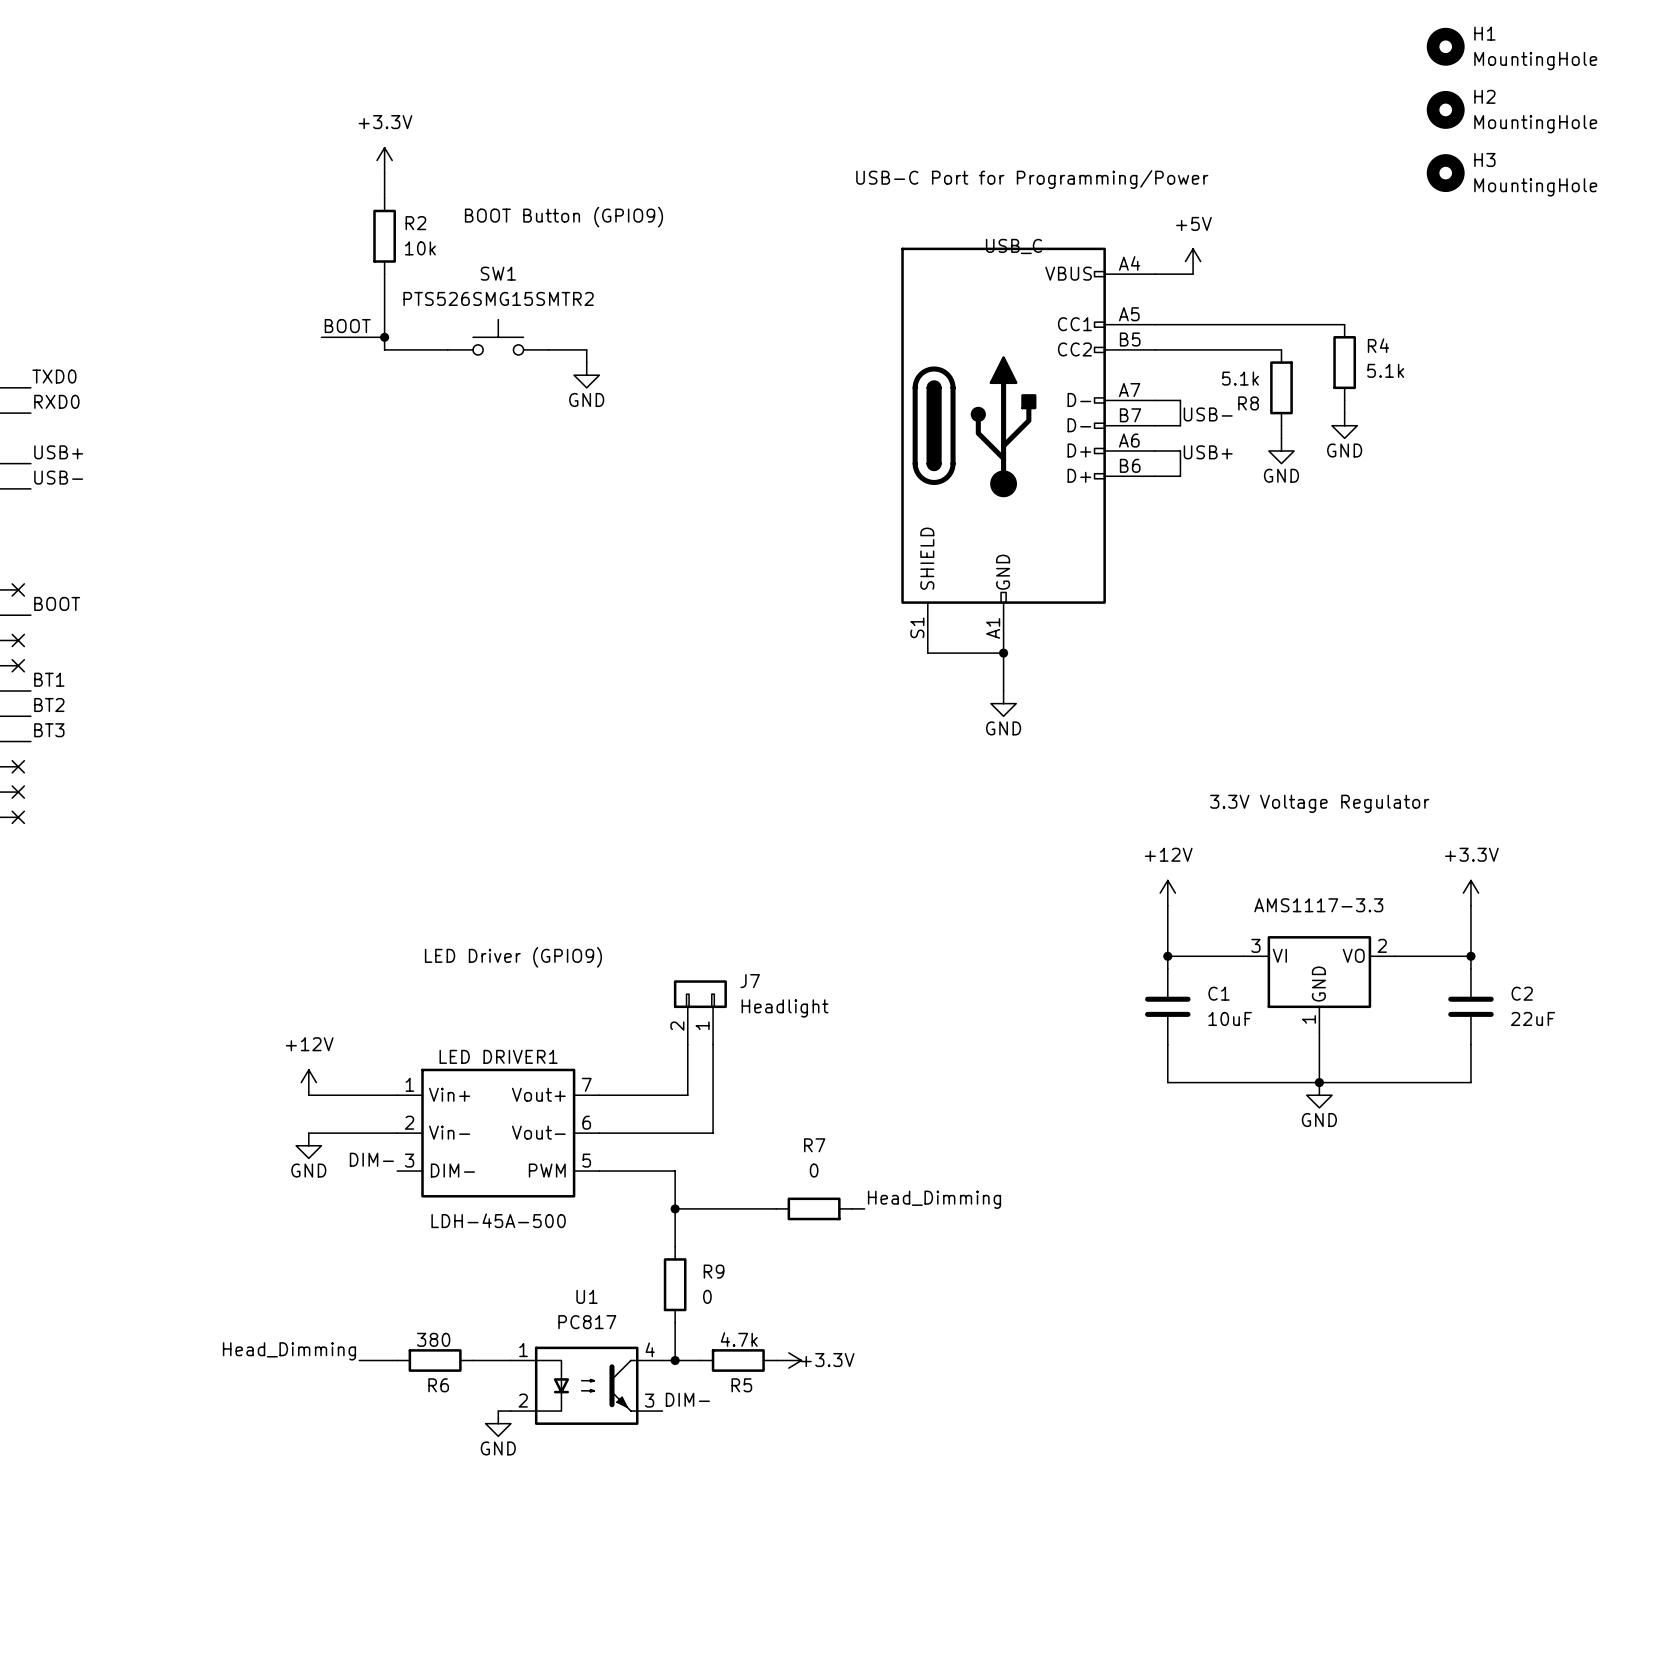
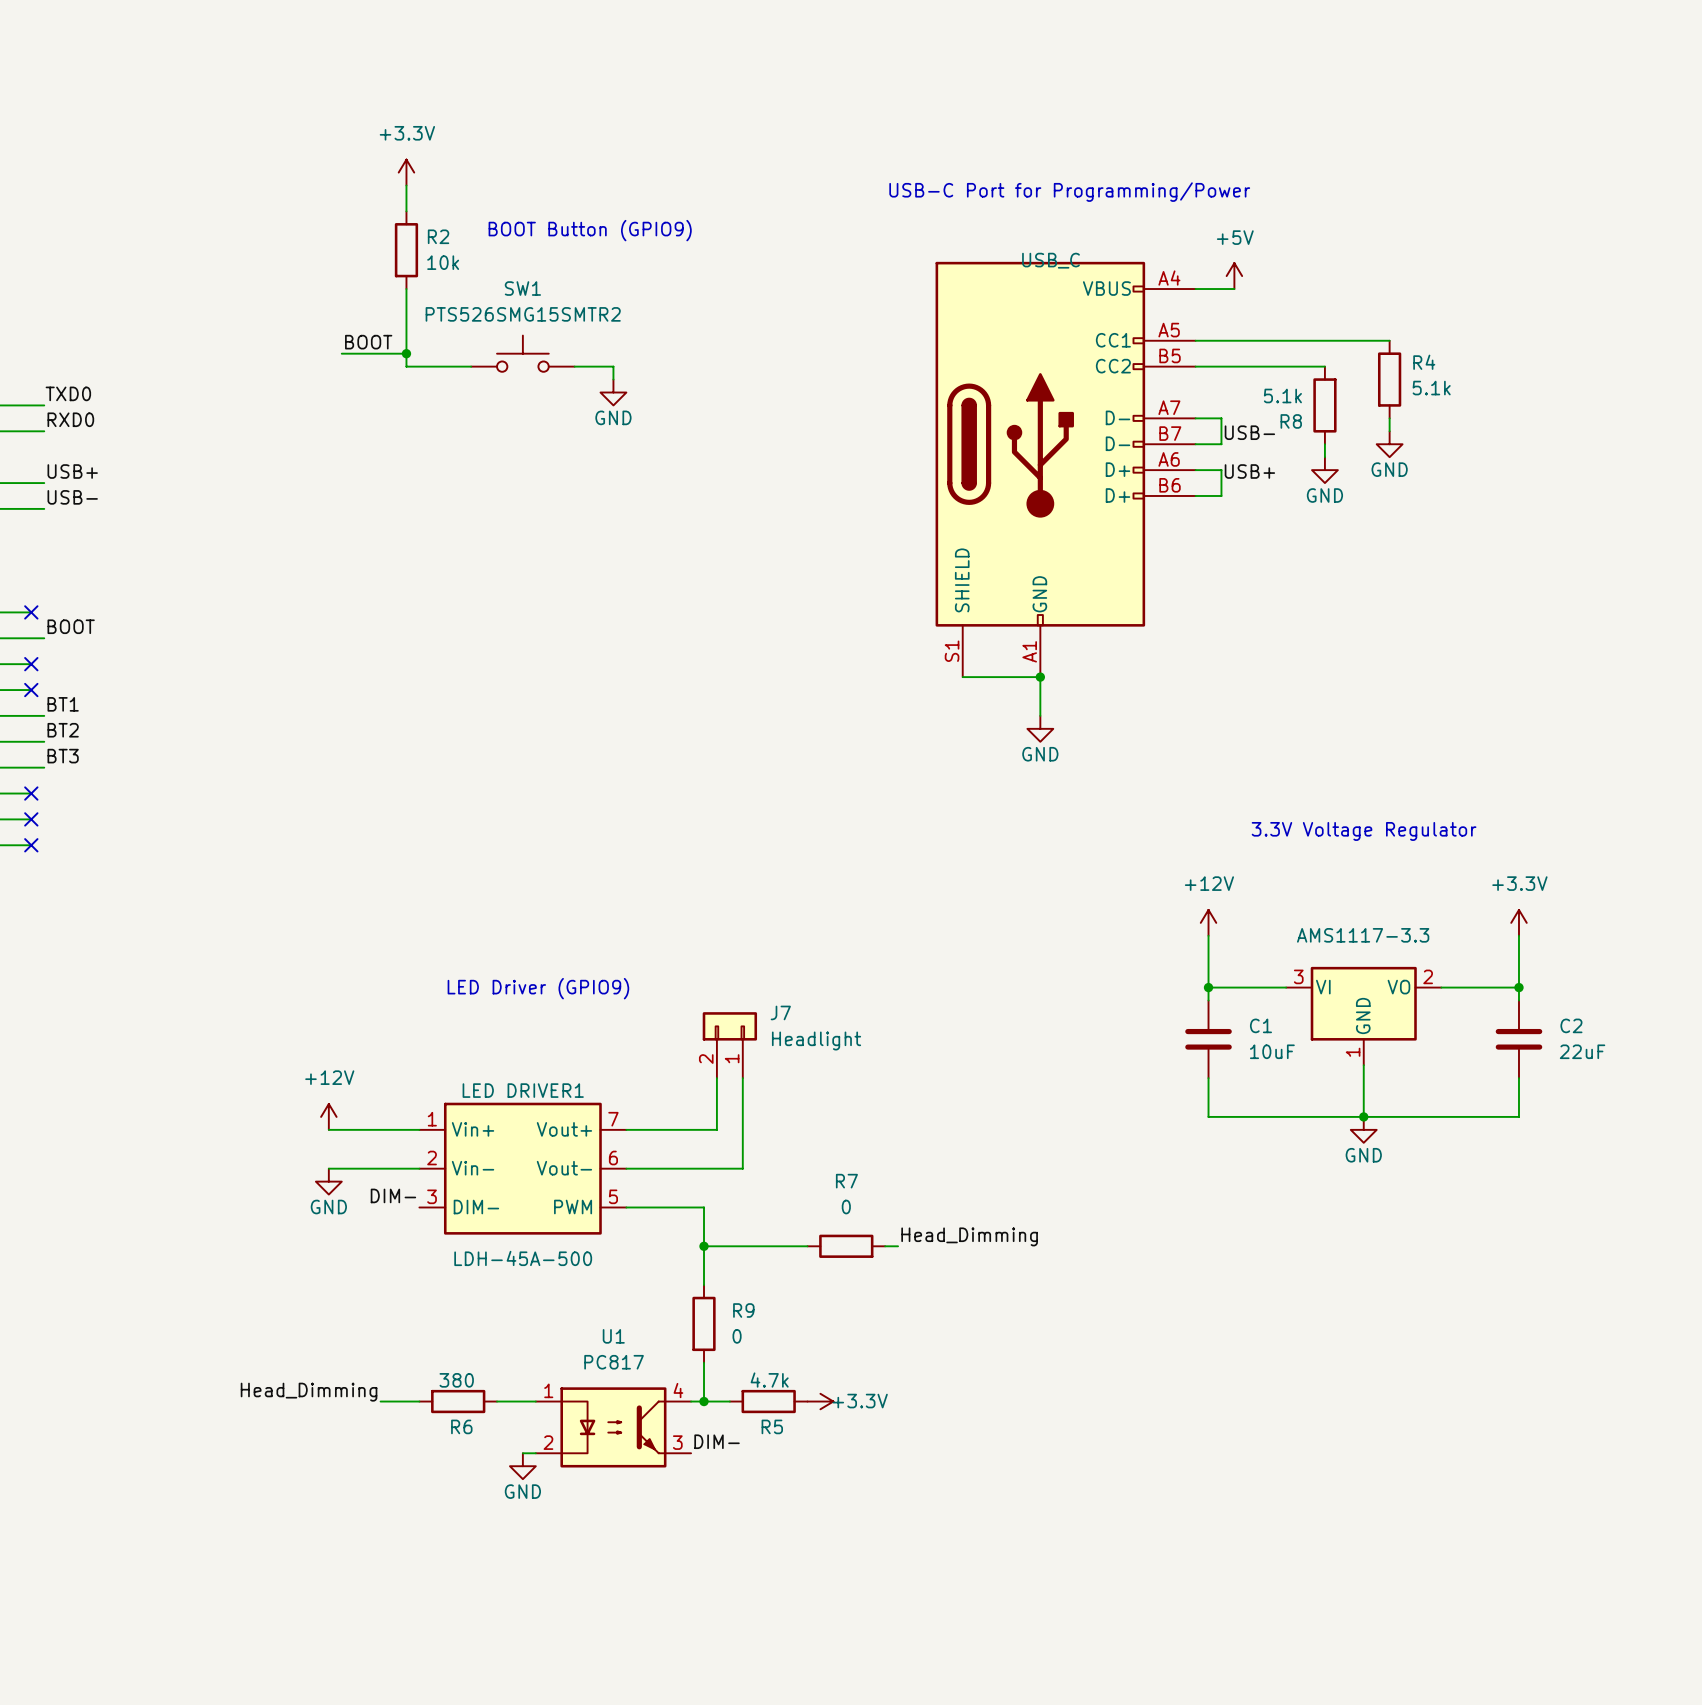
H1: MountingHole (1445, 46) -> none
H2: MountingHole (1445, 109) -> none
H3: MountingHole (1445, 173) -> none

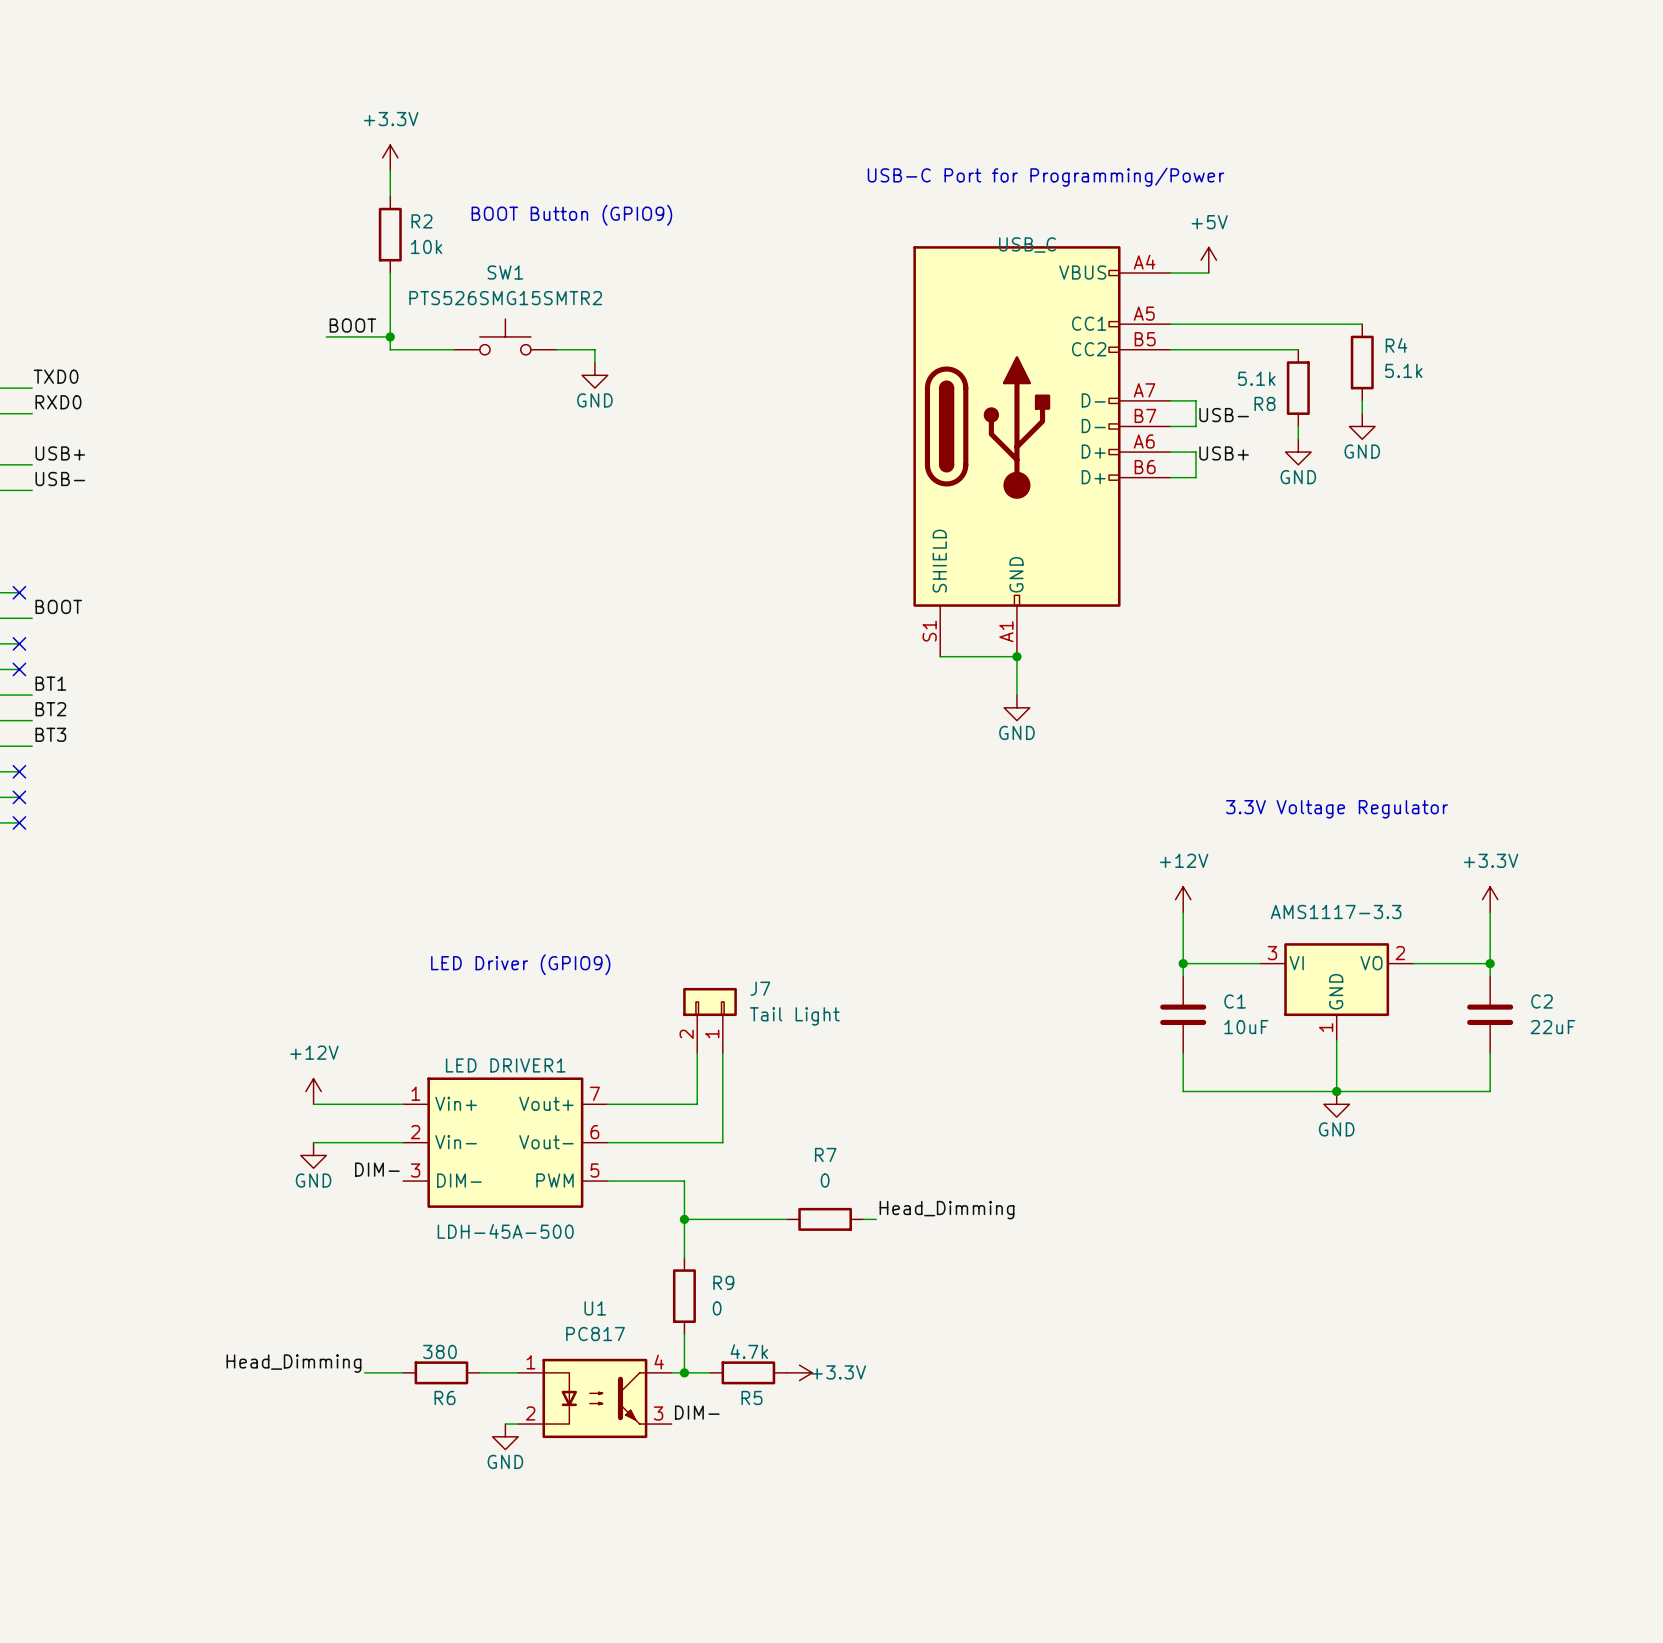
J7 value: Headlight (816, 1040) -> Tail Light (794, 1016)

